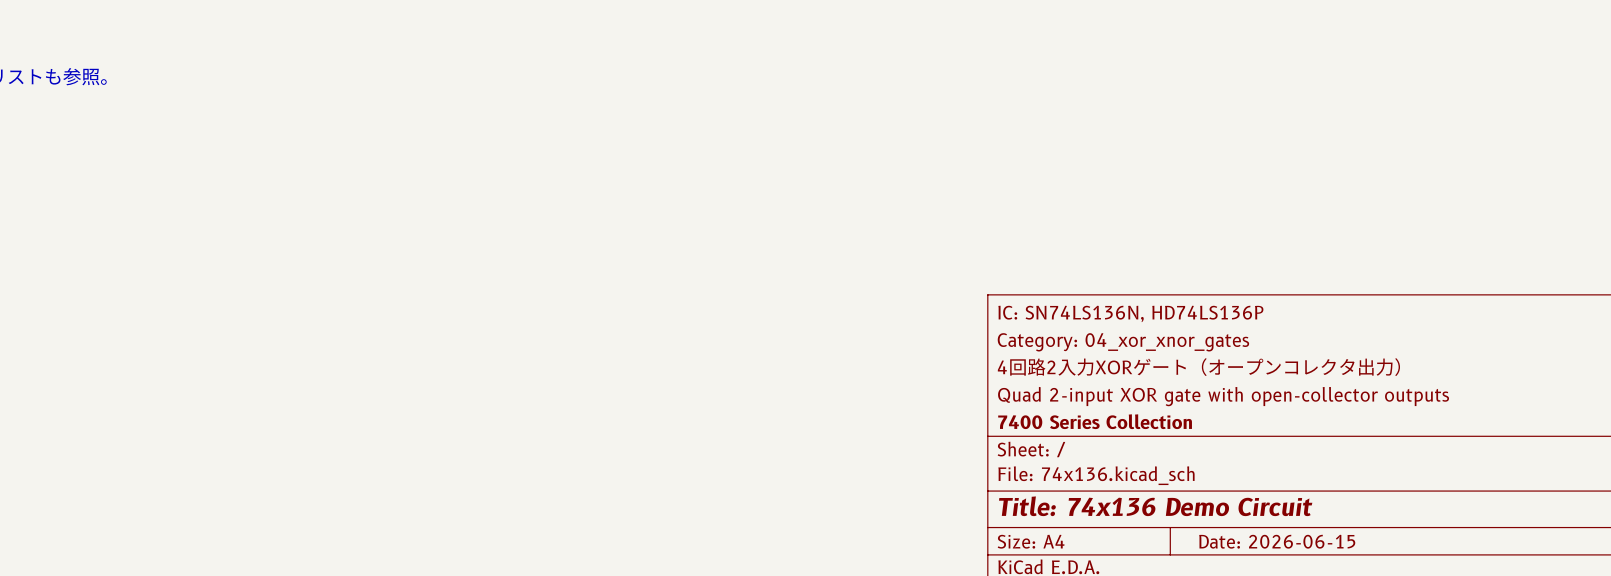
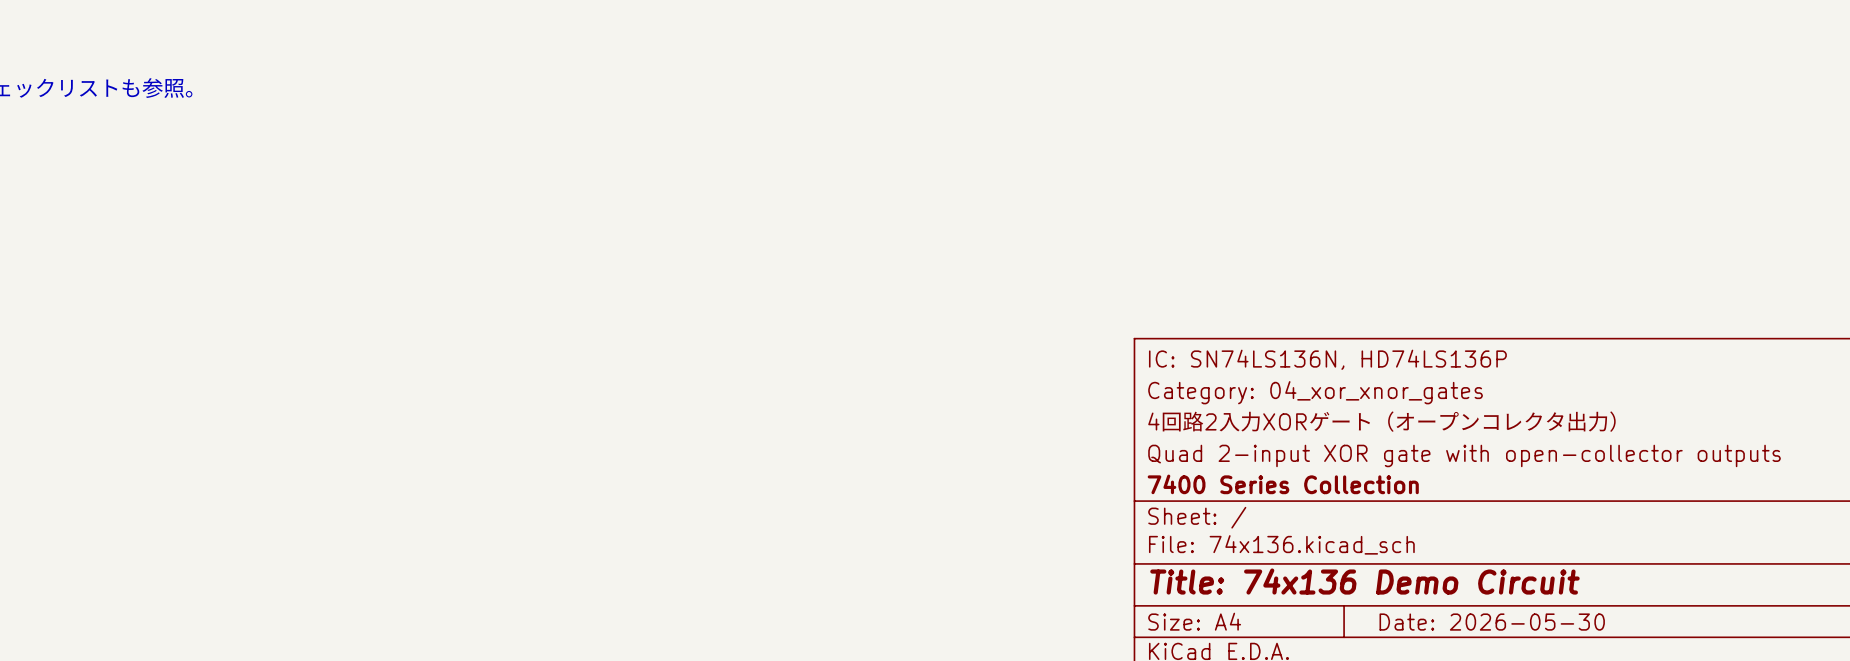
title block: Date: 2026-06-15 (1277, 541) -> Date: 2026-05-30 (1492, 622)

